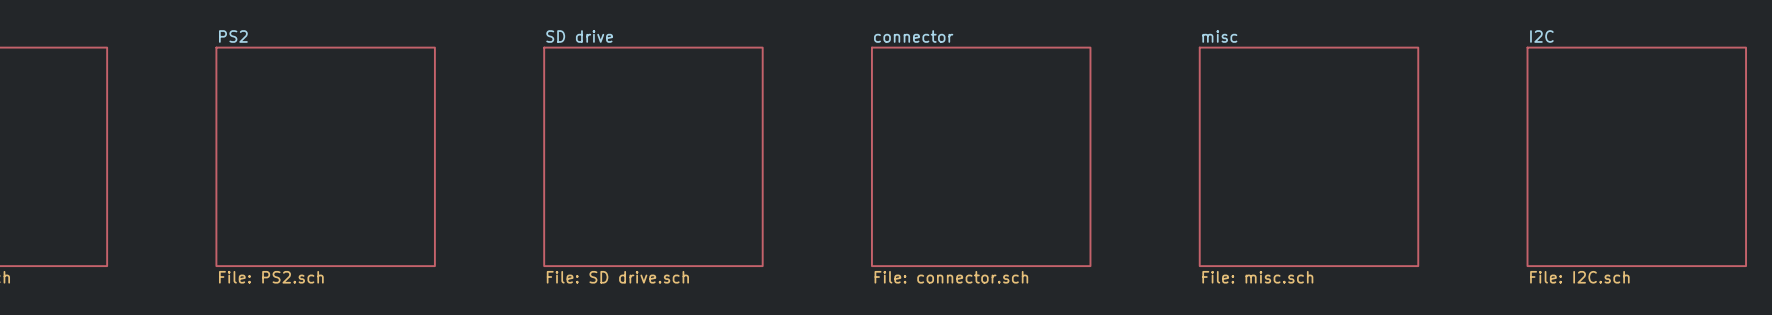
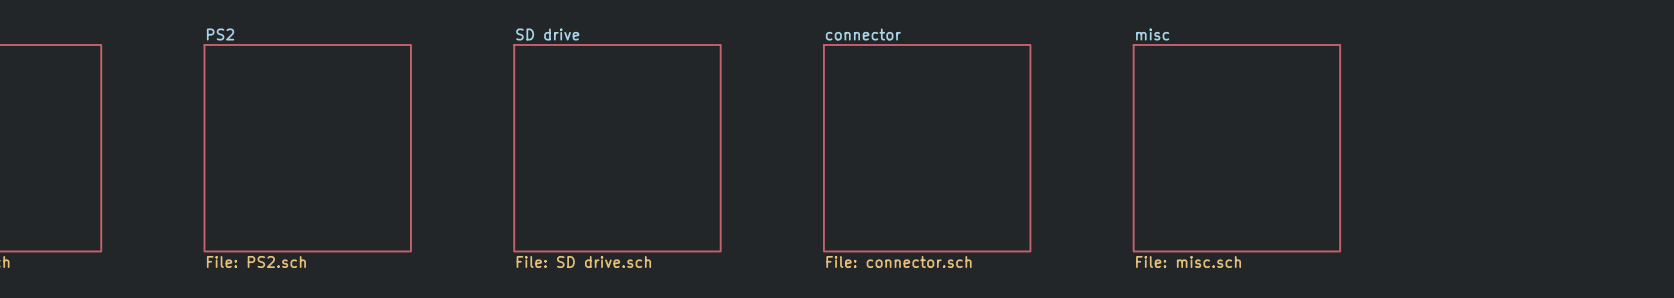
sheet I2C: File: I2C.sch (1636, 156) -> none

